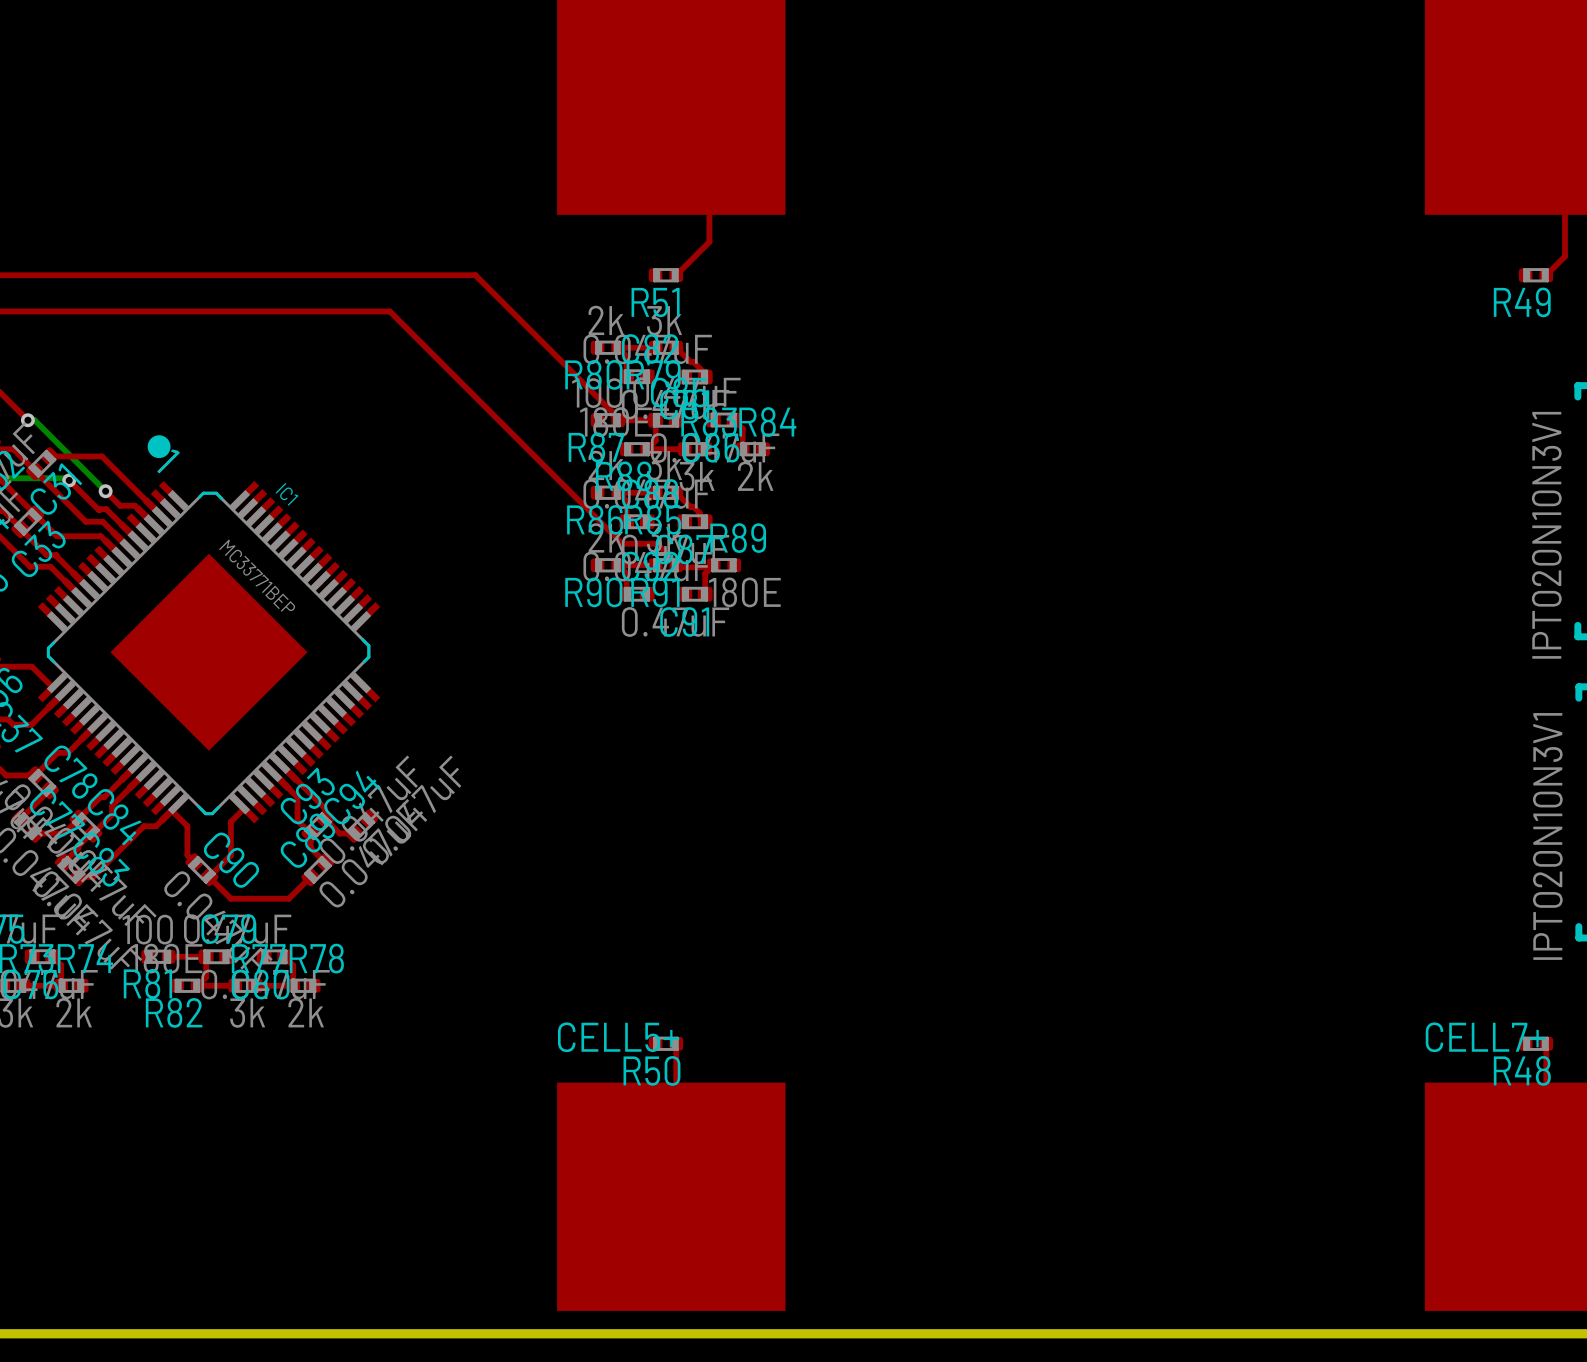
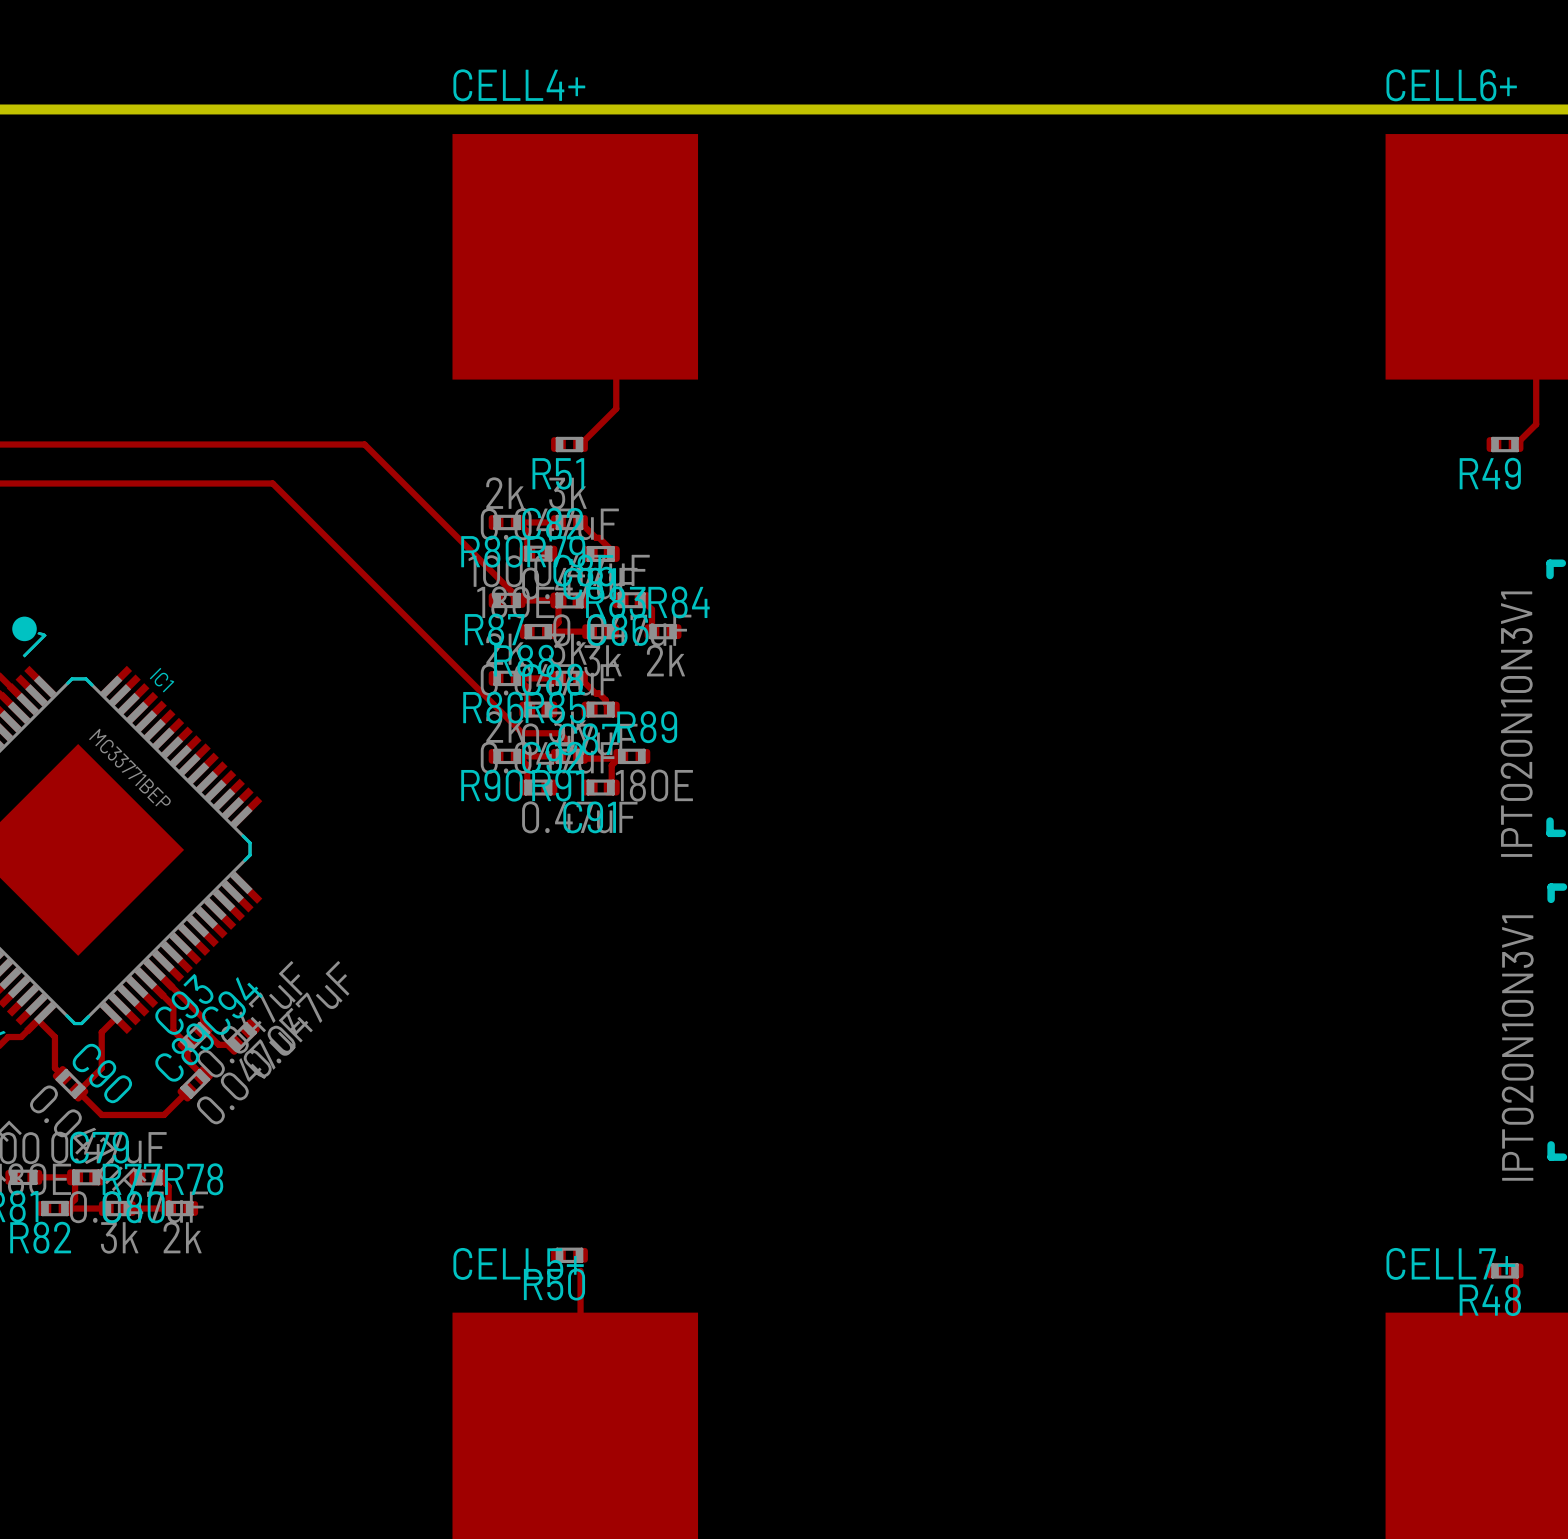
R50 position: (665, 1043) -> (569, 1255)

